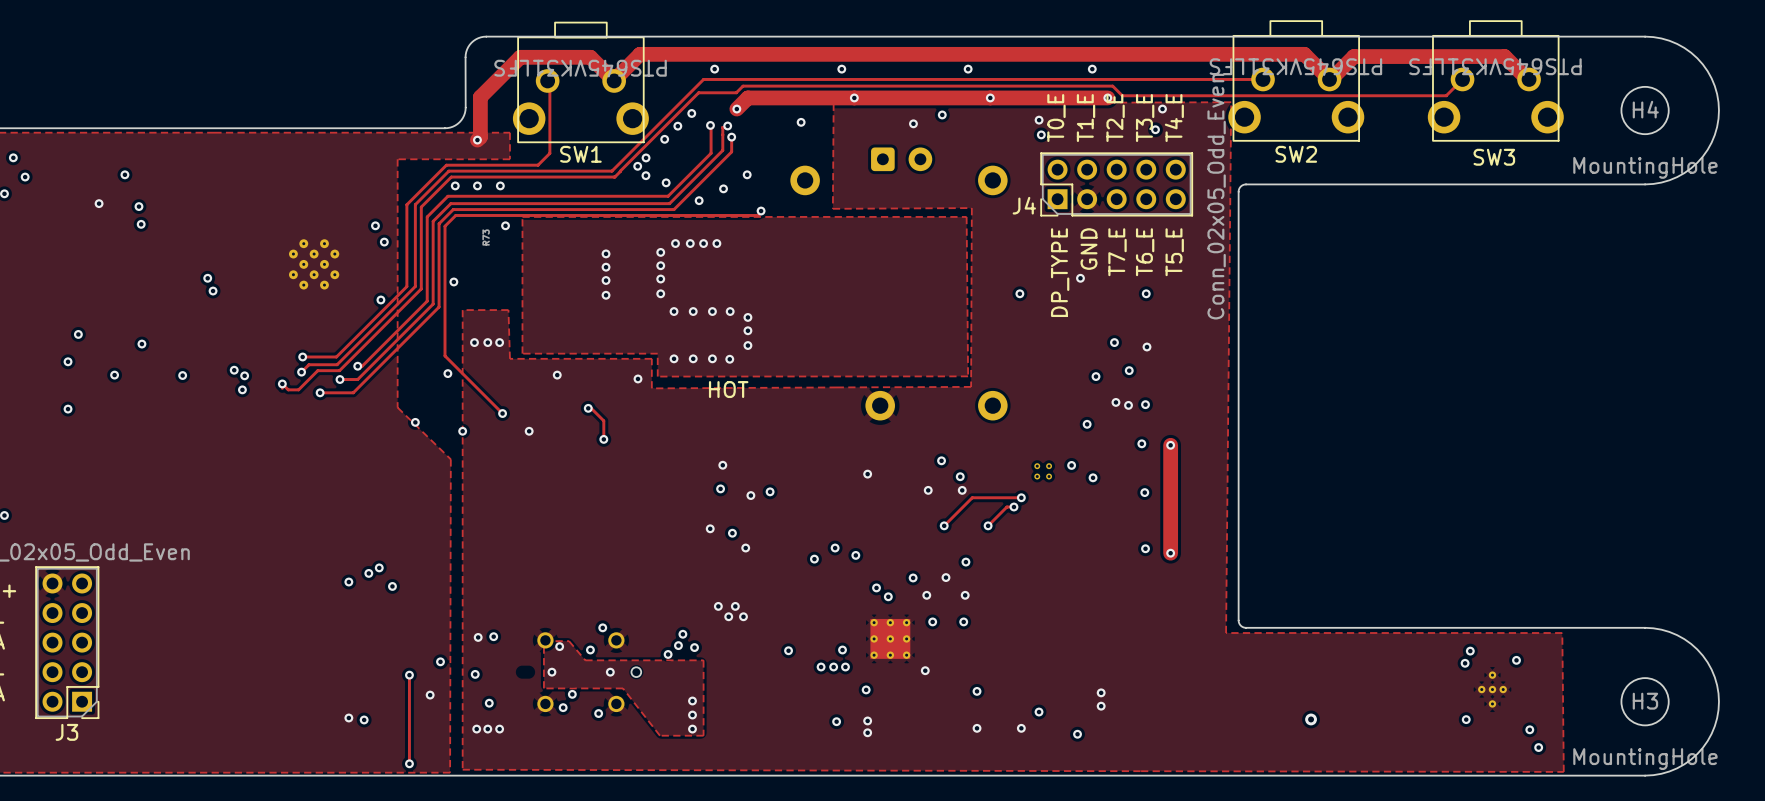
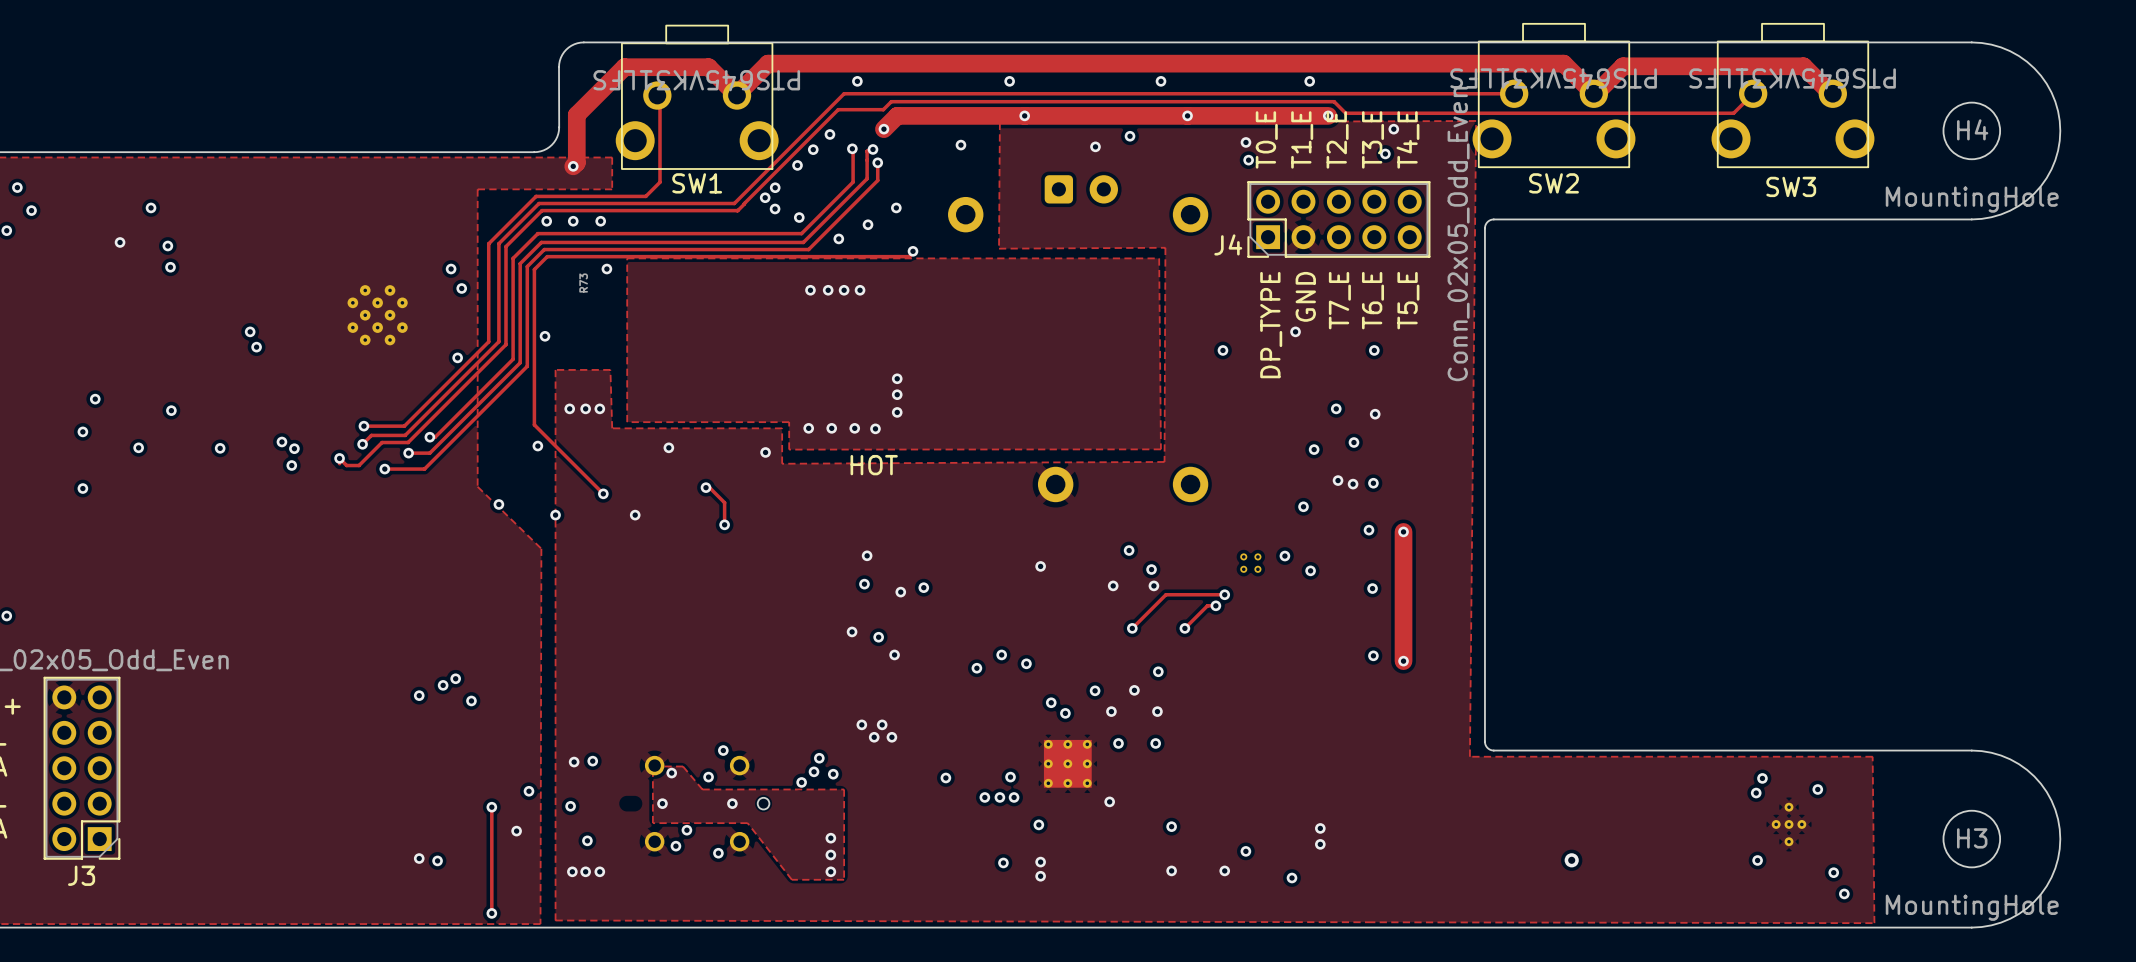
via: (660, 252) -> none
via: (606, 253) -> none
via: (660, 265) -> none
via: (606, 267) -> none
via: (660, 279) -> none
via: (606, 280) -> none
via: (660, 293) -> none
via: (606, 295) -> none
via: (674, 311) -> none
via: (693, 311) -> none
via: (712, 311) -> none
via: (730, 311) -> none

